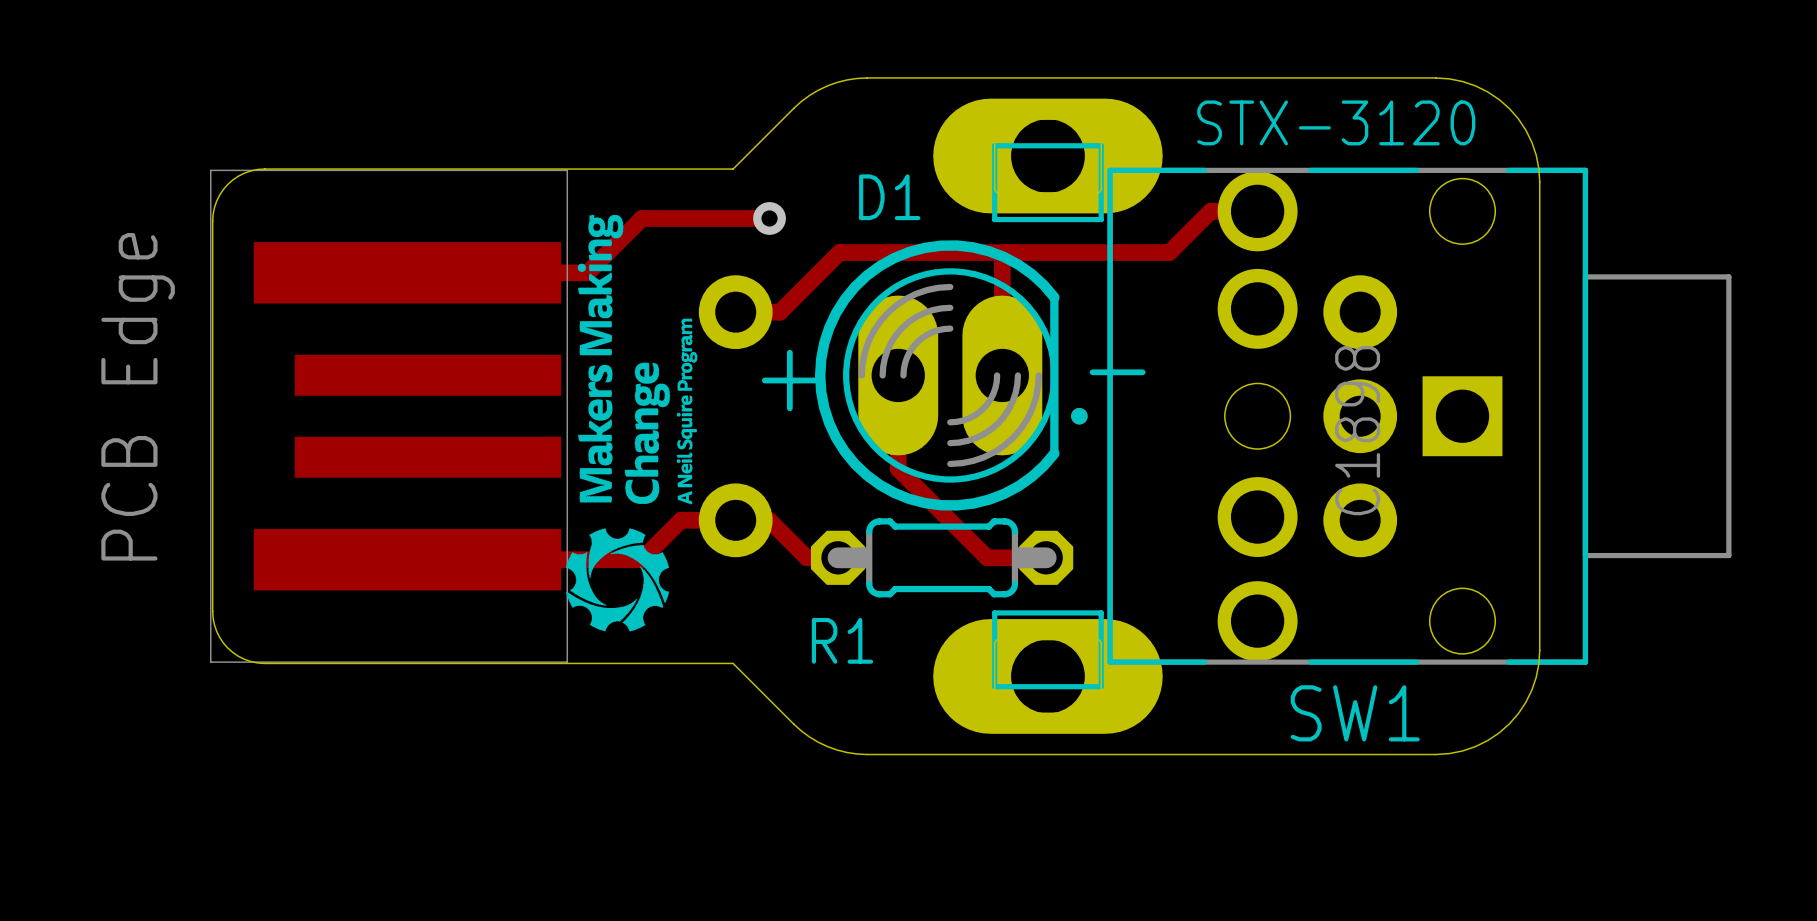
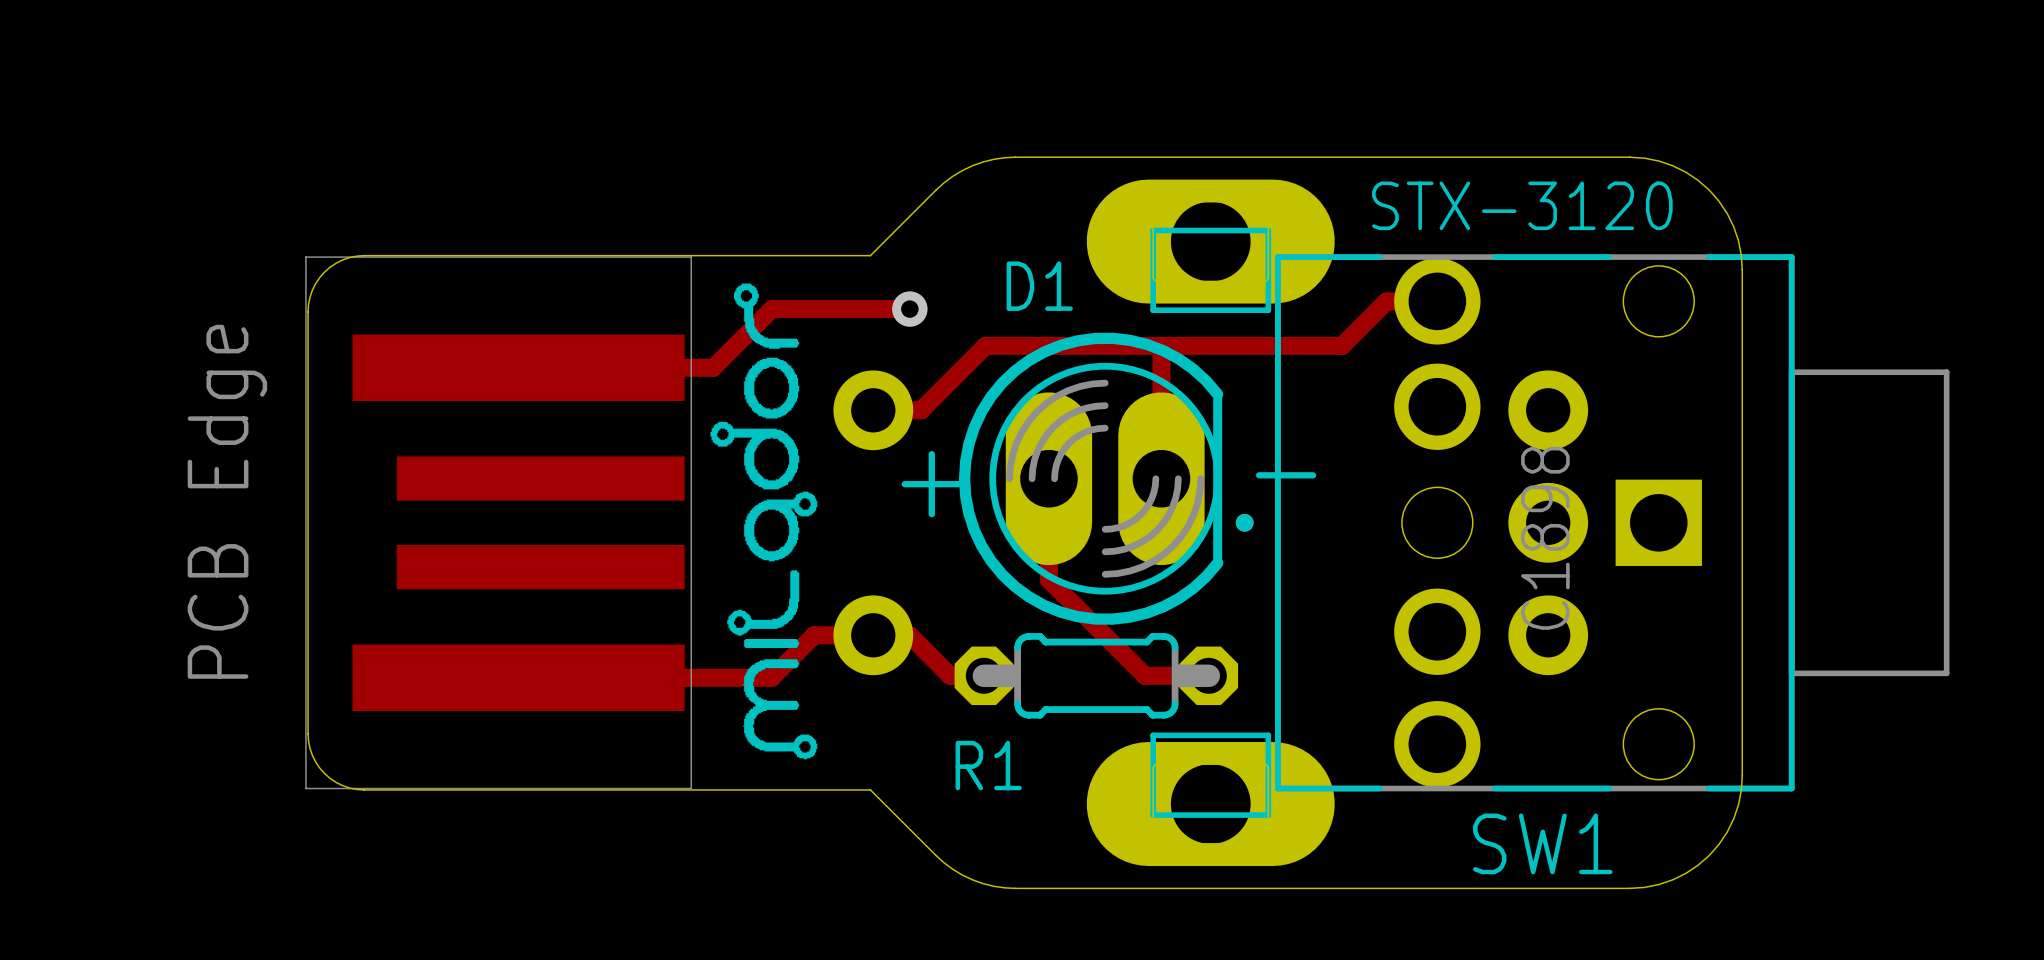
drawing shape: [566, 214, 698, 632] -> [710, 283, 818, 760]

